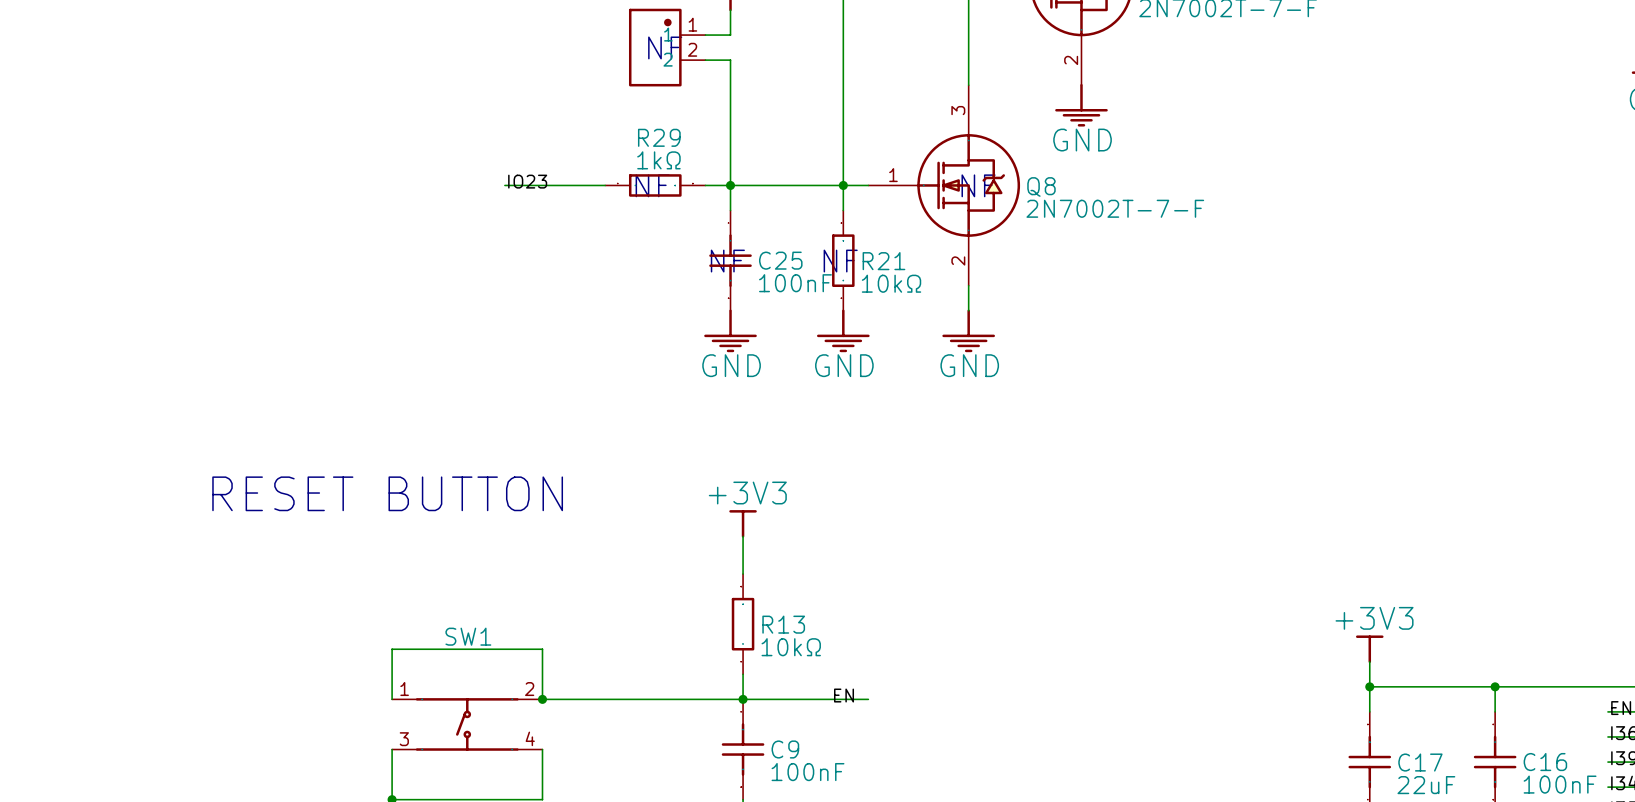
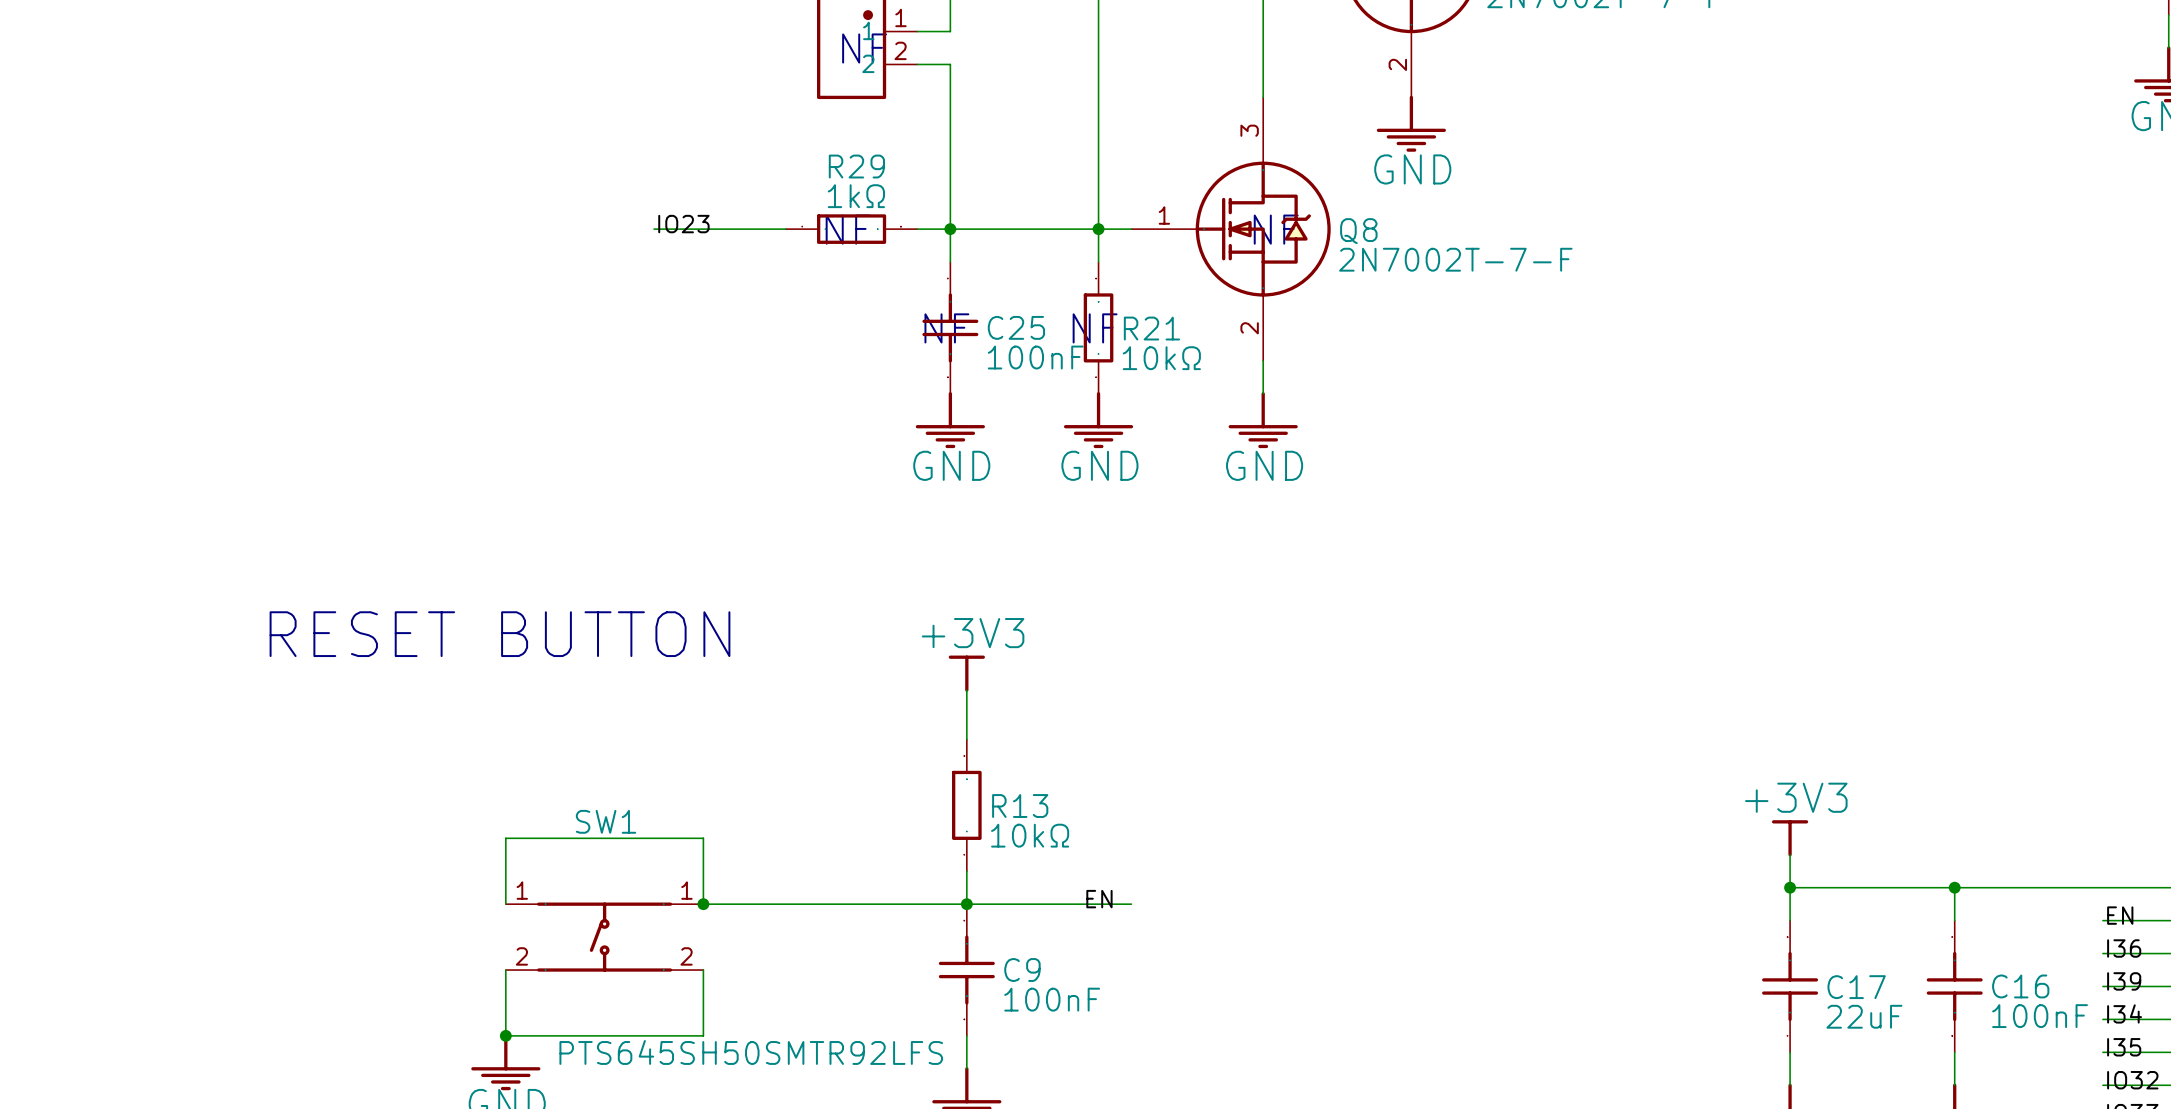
SW1 pin number: 2 (529, 689) -> 1 (686, 890)
SW1 pin number: 4 (530, 738) -> 2 (686, 956)
SW1 pin number: 3 (404, 739) -> 2 (521, 956)

